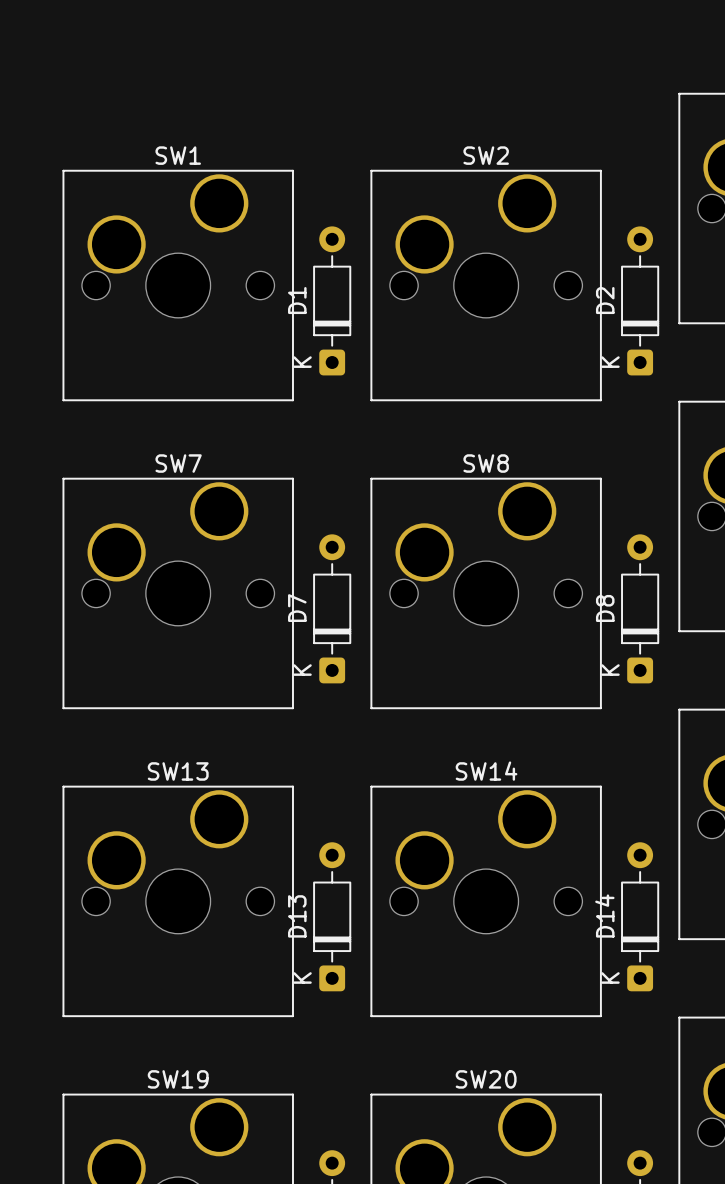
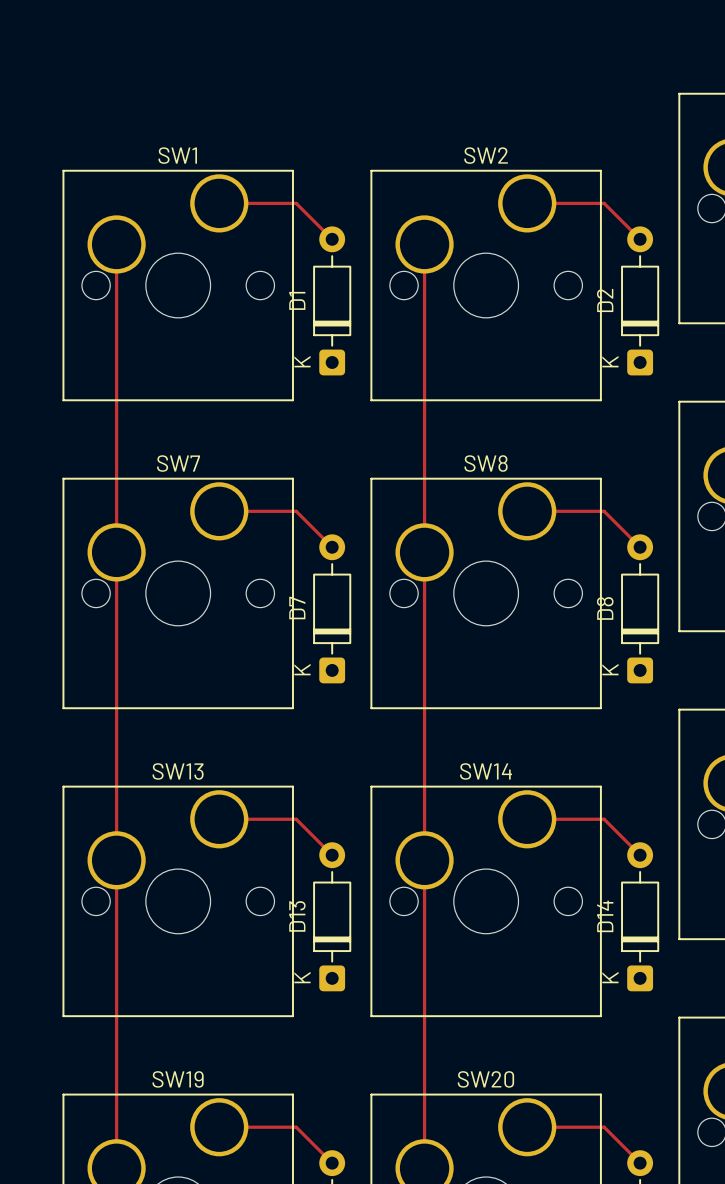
track: none -> (219, 203) (296, 203) (332, 239)
track: none -> (527, 203) (604, 203) (640, 239)
track: none -> (116, 244) (116, 1168)
track: none -> (424, 244) (424, 1168)
track: none -> (219, 511) (296, 511) (332, 547)
track: none -> (527, 511) (604, 511) (640, 547)
track: none -> (219, 819) (296, 819) (332, 855)
track: none -> (527, 819) (604, 819) (640, 855)
track: none -> (219, 1127) (296, 1127) (332, 1163)
track: none -> (527, 1127) (604, 1127) (640, 1163)

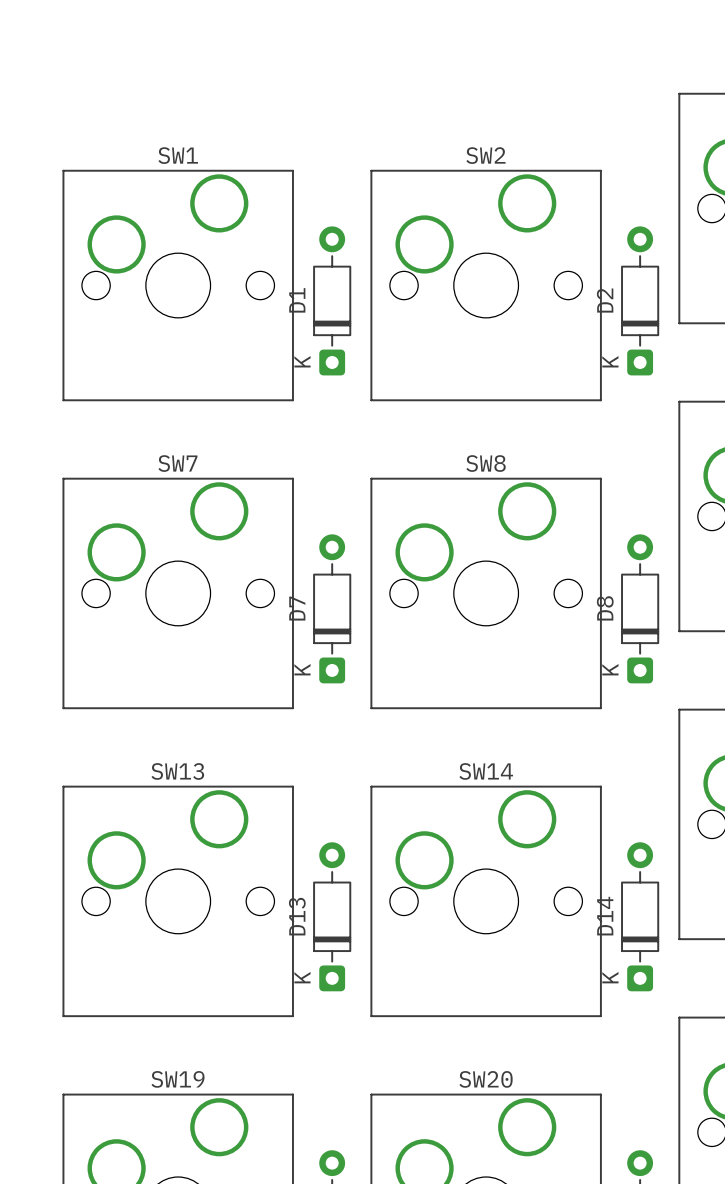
track: (219, 203) (296, 203) (332, 239) -> none
track: (527, 203) (604, 203) (640, 239) -> none
track: (116, 244) (116, 1168) -> none
track: (424, 244) (424, 1168) -> none
track: (219, 511) (296, 511) (332, 547) -> none
track: (527, 511) (604, 511) (640, 547) -> none
track: (219, 819) (296, 819) (332, 855) -> none
track: (527, 819) (604, 819) (640, 855) -> none
track: (219, 1127) (296, 1127) (332, 1163) -> none
track: (527, 1127) (604, 1127) (640, 1163) -> none

